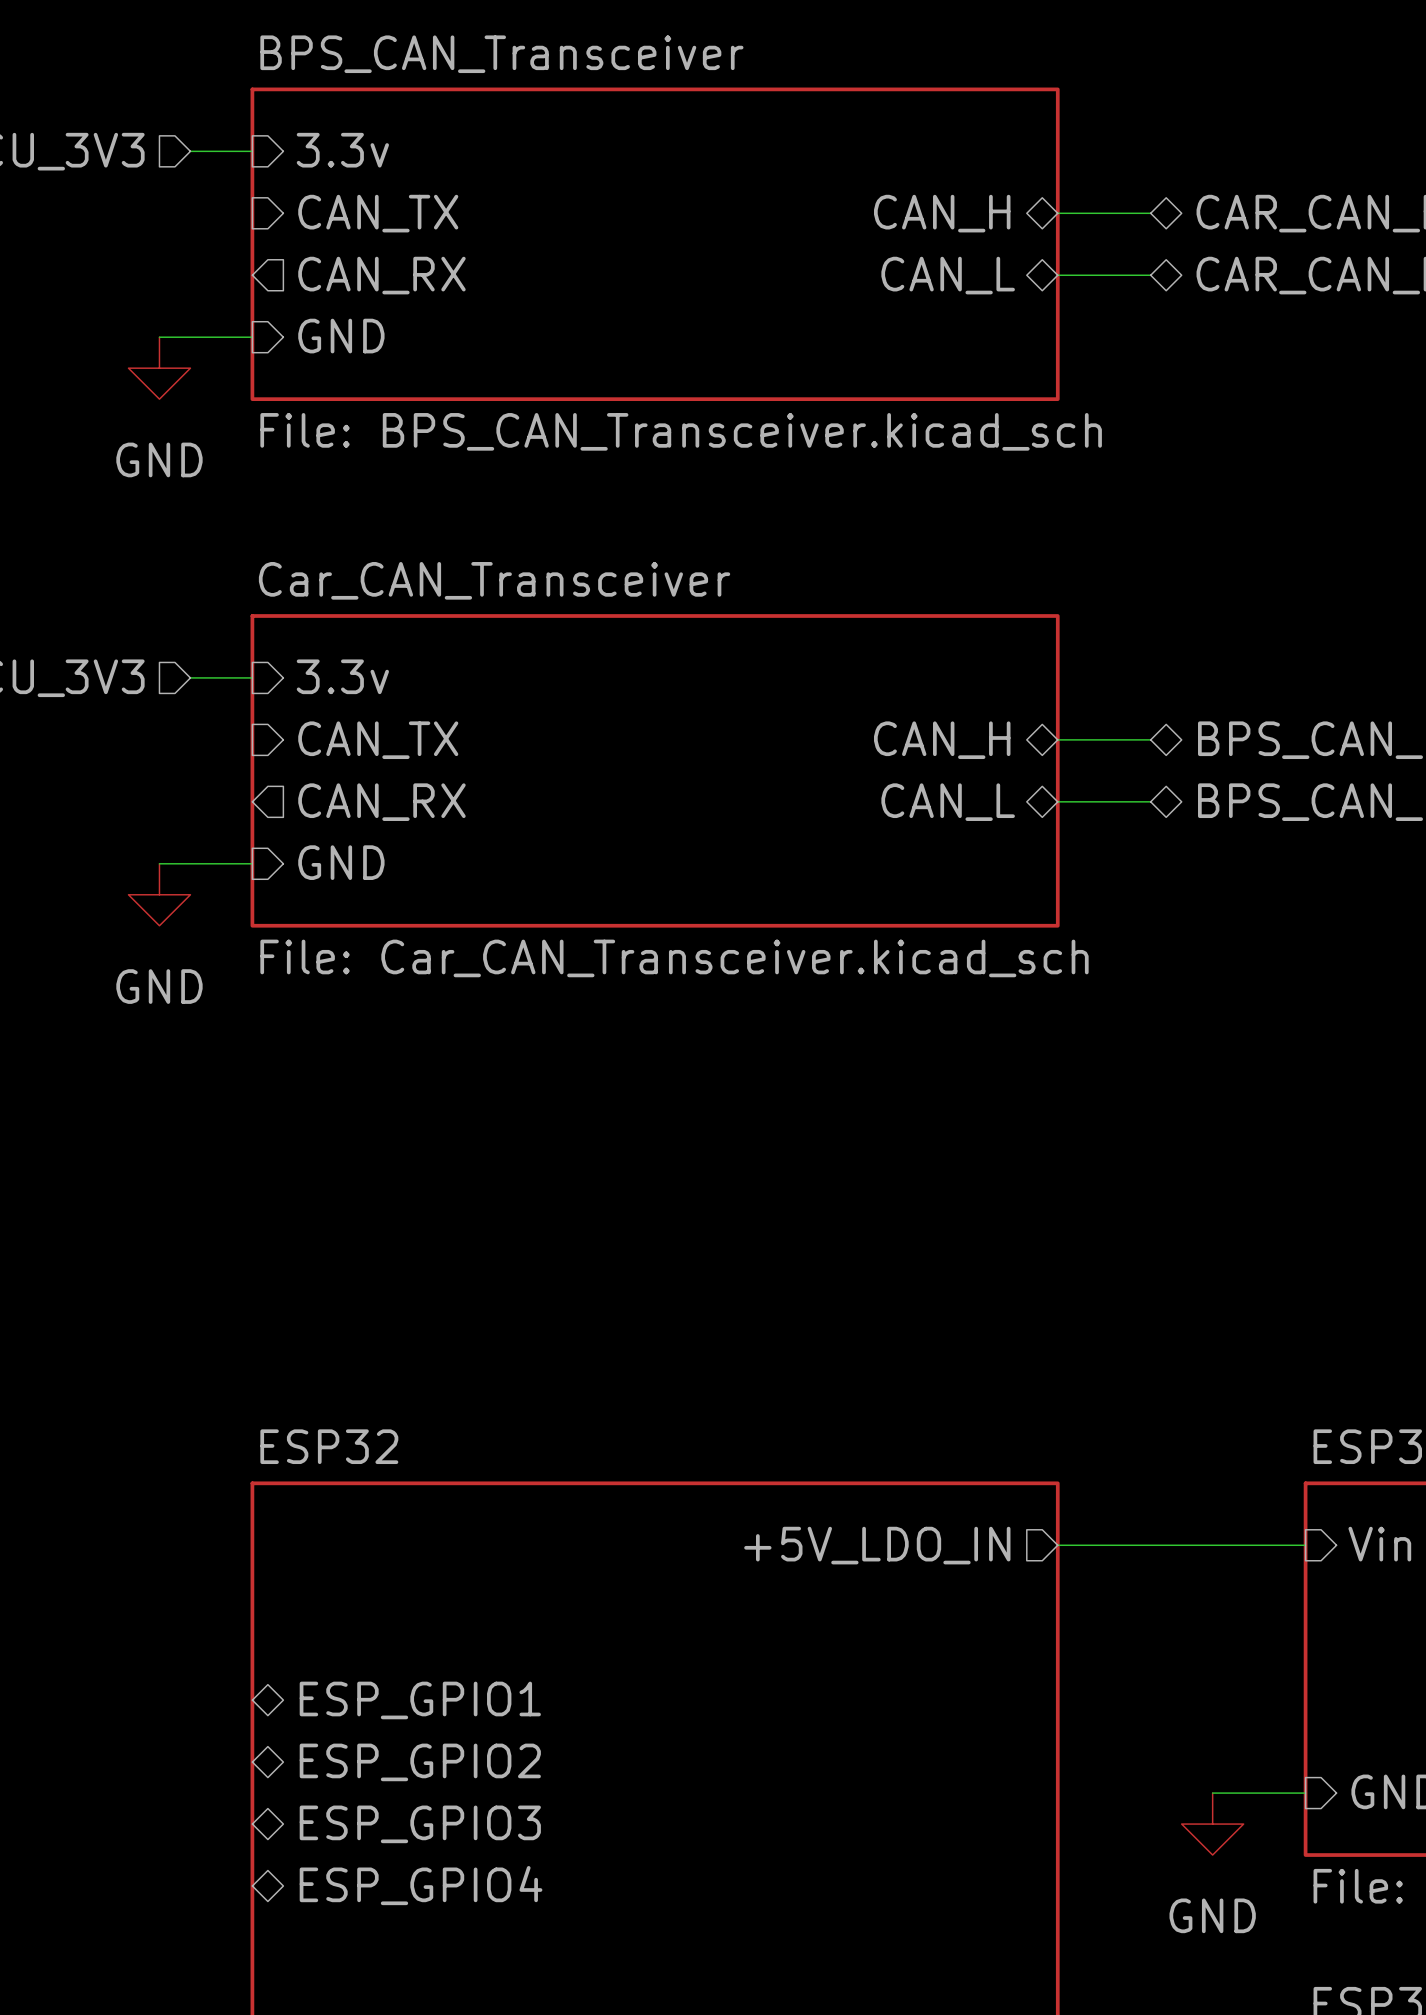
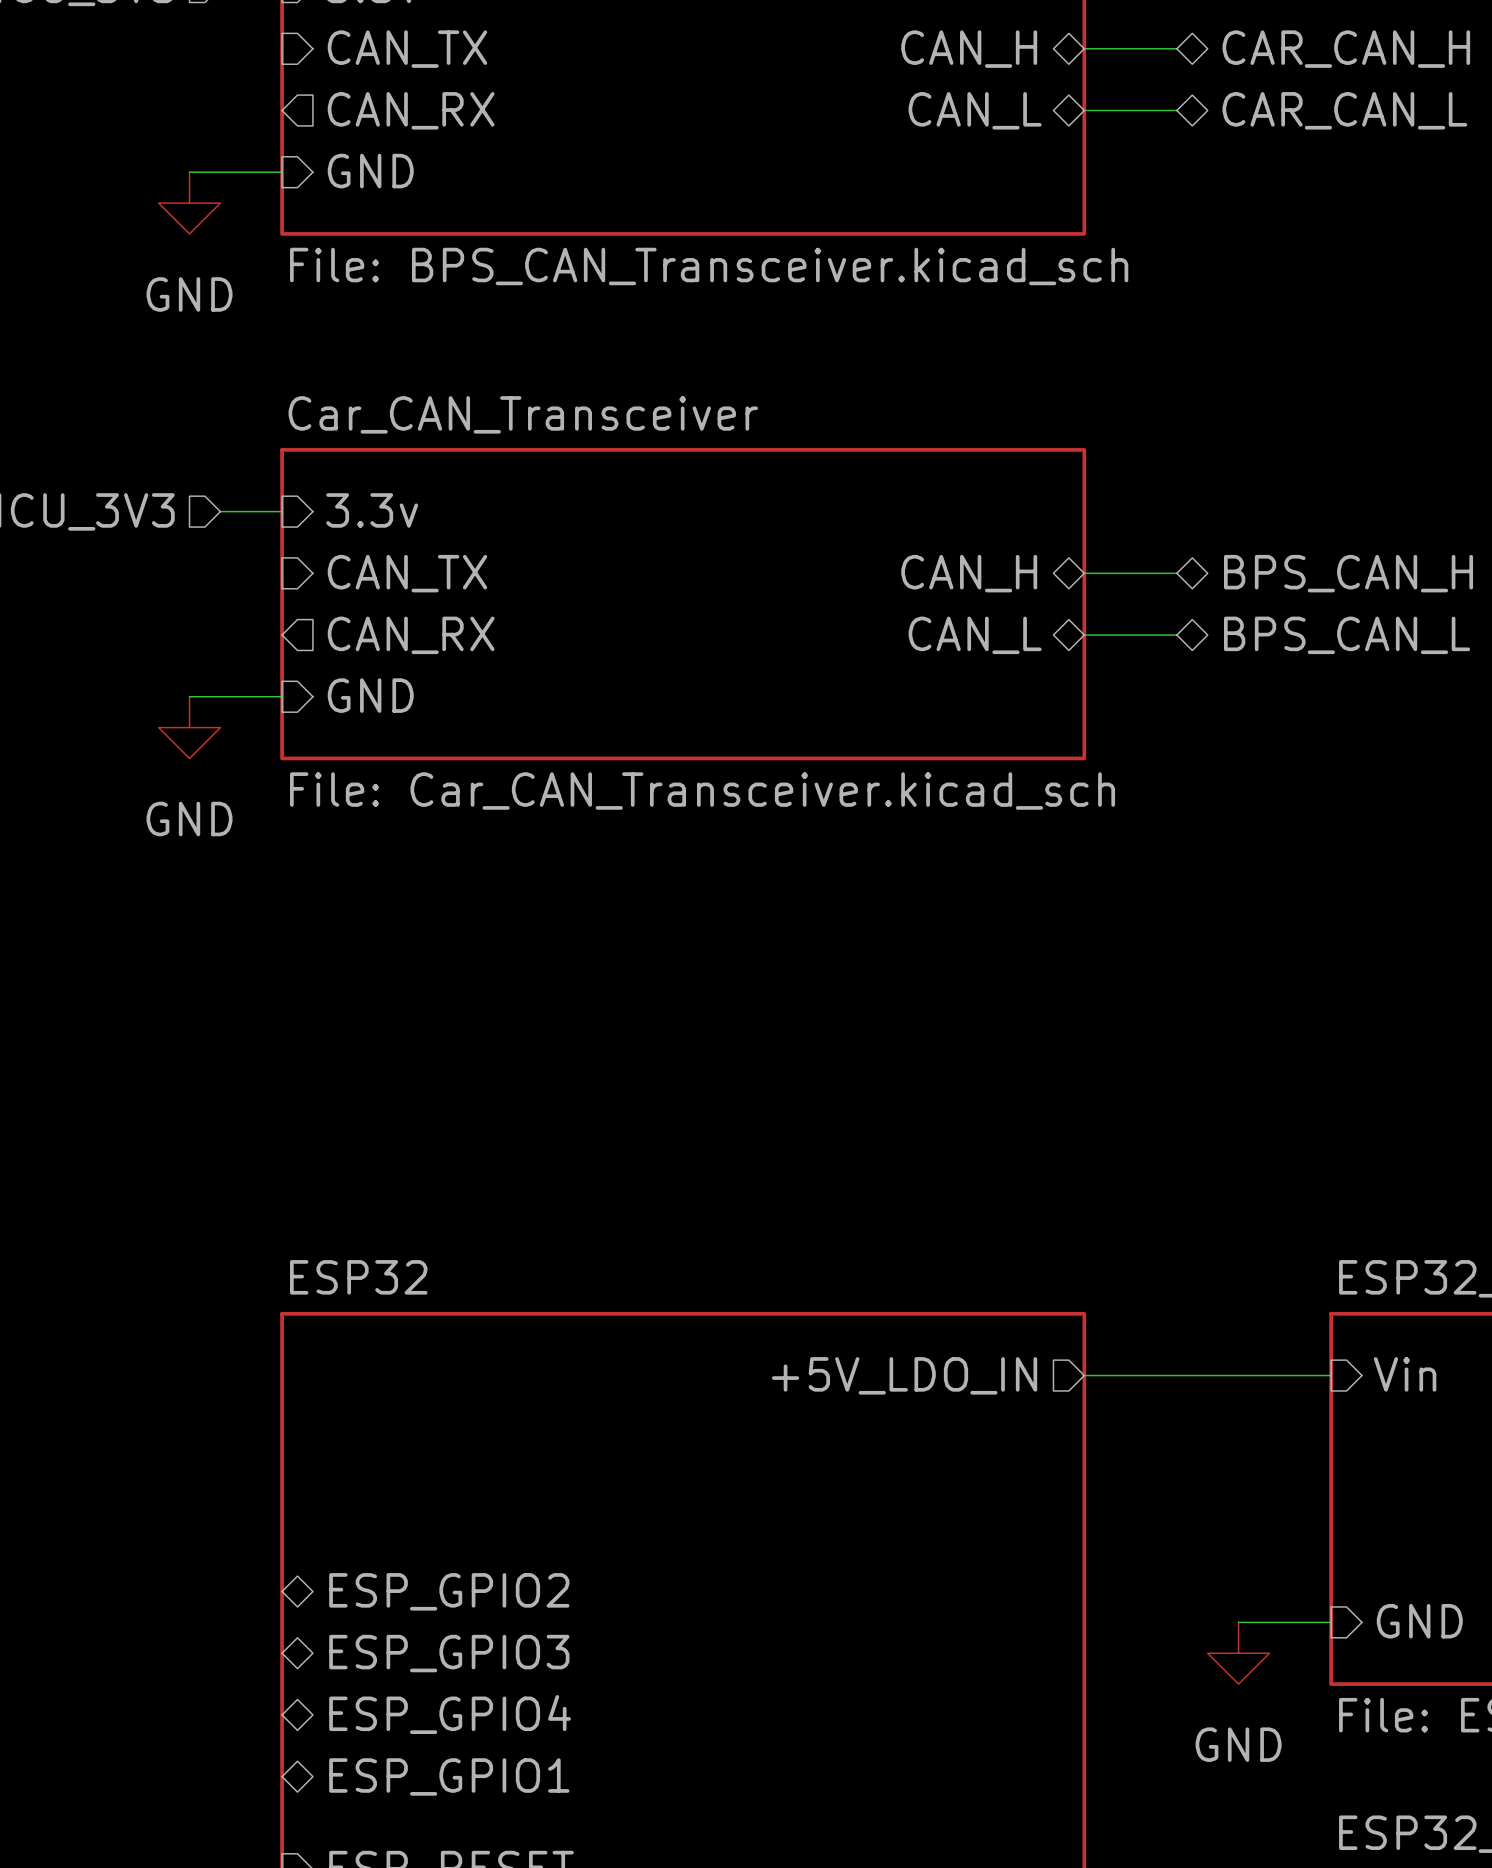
sheet pin position: ESP_GPIO1 (420, 1700) -> ESP_GPIO1 (449, 1776)

